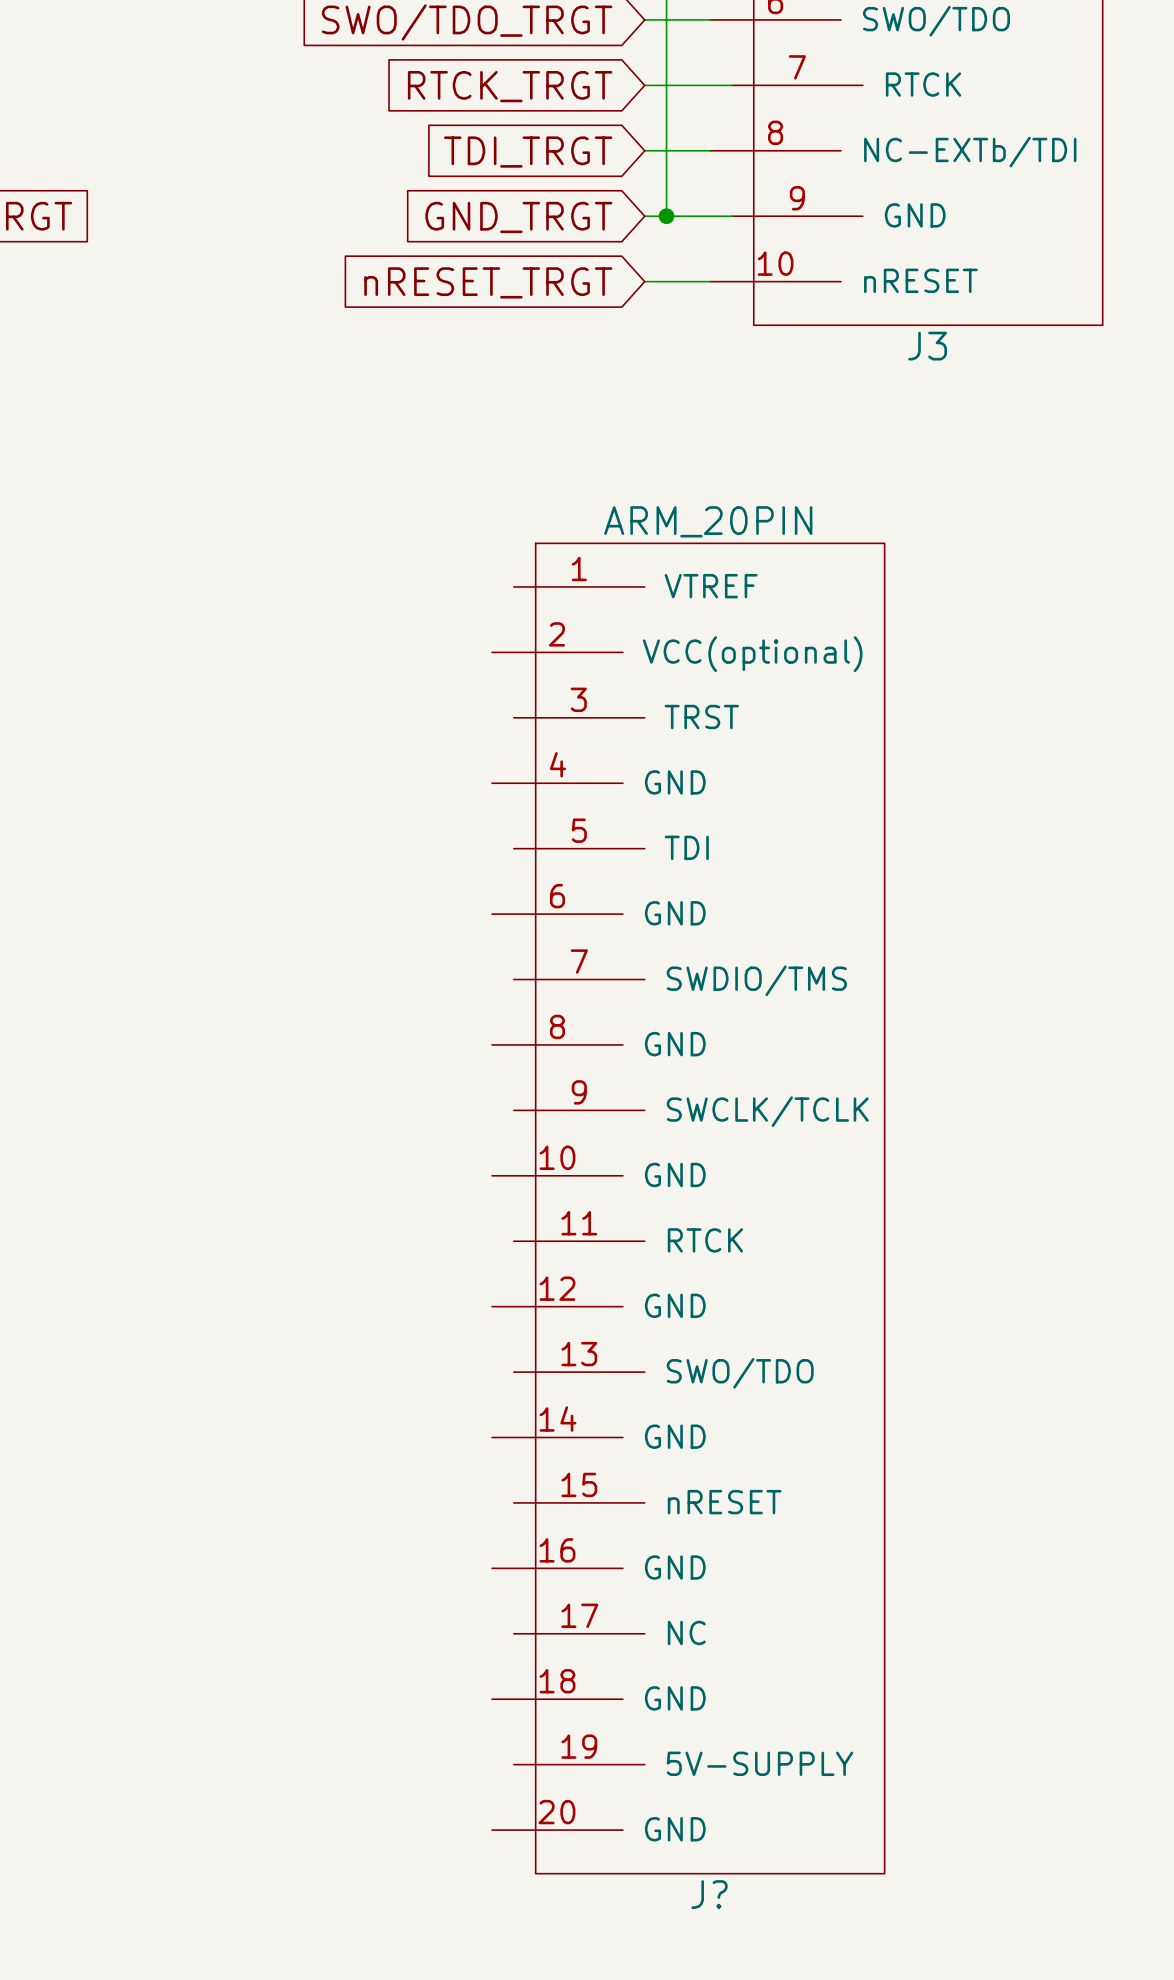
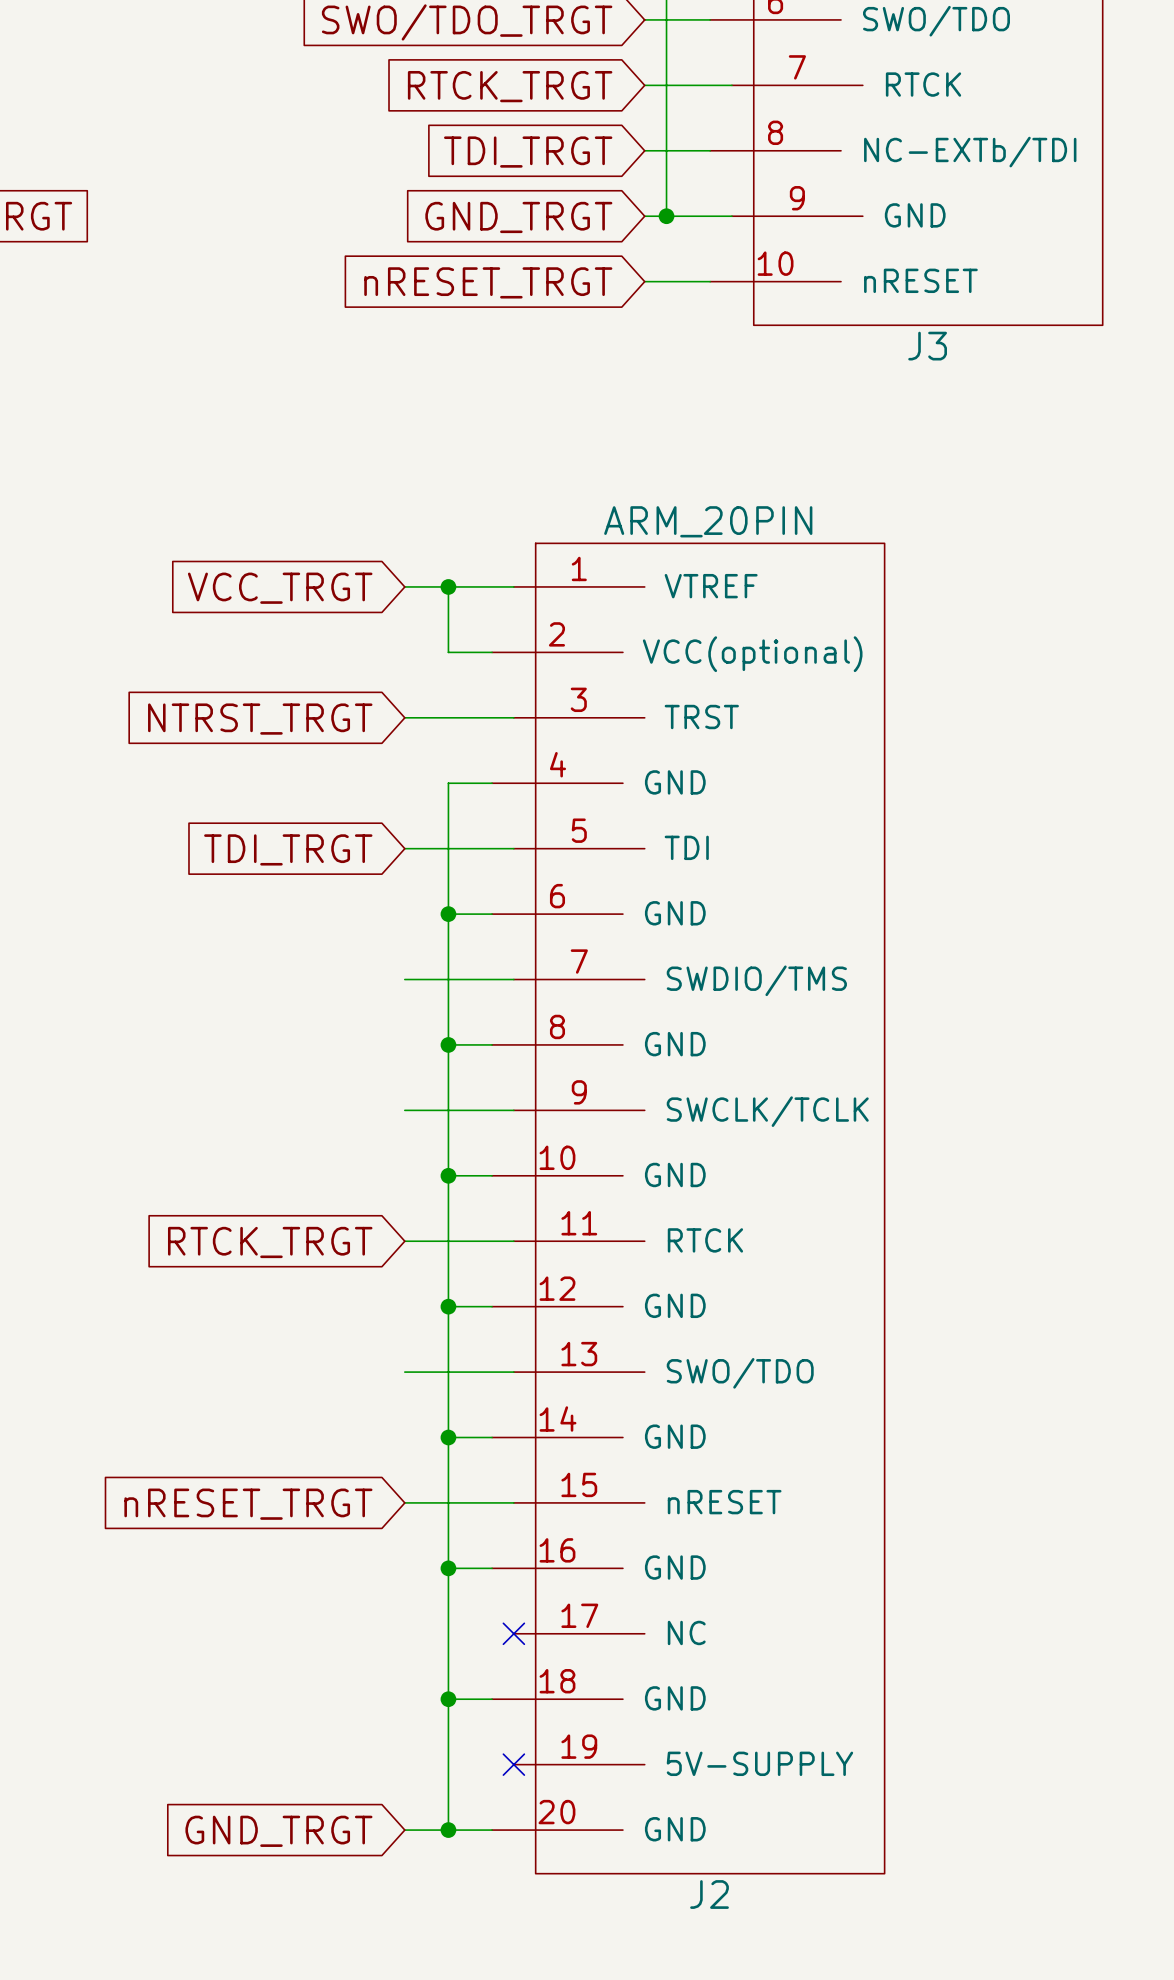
wire: none -> (404, 586) (513, 586)
wire: none -> (448, 586) (448, 652) (492, 652)
junction: none -> (448, 586)
global label: none -> VCC_TRGT (280, 588)
wire: none -> (404, 717) (513, 717)
global label: none -> NTRST_TRGT (260, 719)
wire: none -> (492, 783) (448, 783) (448, 1830)
wire: none -> (404, 848) (513, 848)
global label: none -> TDI_TRGT (288, 849)
wire: none -> (448, 914) (492, 914)
junction: none -> (448, 914)
wire: none -> (404, 979) (513, 979)
wire: none -> (448, 1044) (492, 1044)
junction: none -> (448, 1044)
wire: none -> (404, 1110) (513, 1110)
wire: none -> (448, 1175) (492, 1175)
junction: none -> (448, 1175)
wire: none -> (404, 1241) (513, 1241)
global label: none -> RTCK_TRGT (270, 1242)
wire: none -> (448, 1306) (492, 1306)
junction: none -> (448, 1306)
wire: none -> (404, 1372) (513, 1372)
wire: none -> (448, 1437) (492, 1437)
junction: none -> (448, 1437)
wire: none -> (404, 1502) (513, 1502)
global label: none -> nRESET_TRGT (248, 1504)
wire: none -> (448, 1568) (492, 1568)
junction: none -> (448, 1568)
no-connect mark: none -> (513, 1633)
wire: none -> (448, 1699) (492, 1699)
junction: none -> (448, 1699)
no-connect mark: none -> (513, 1764)
wire: none -> (404, 1830) (492, 1830)
junction: none -> (448, 1830)
global label: none -> GND_TRGT (278, 1831)
J? name: J? (709, 1894) -> J2 (709, 1894)

